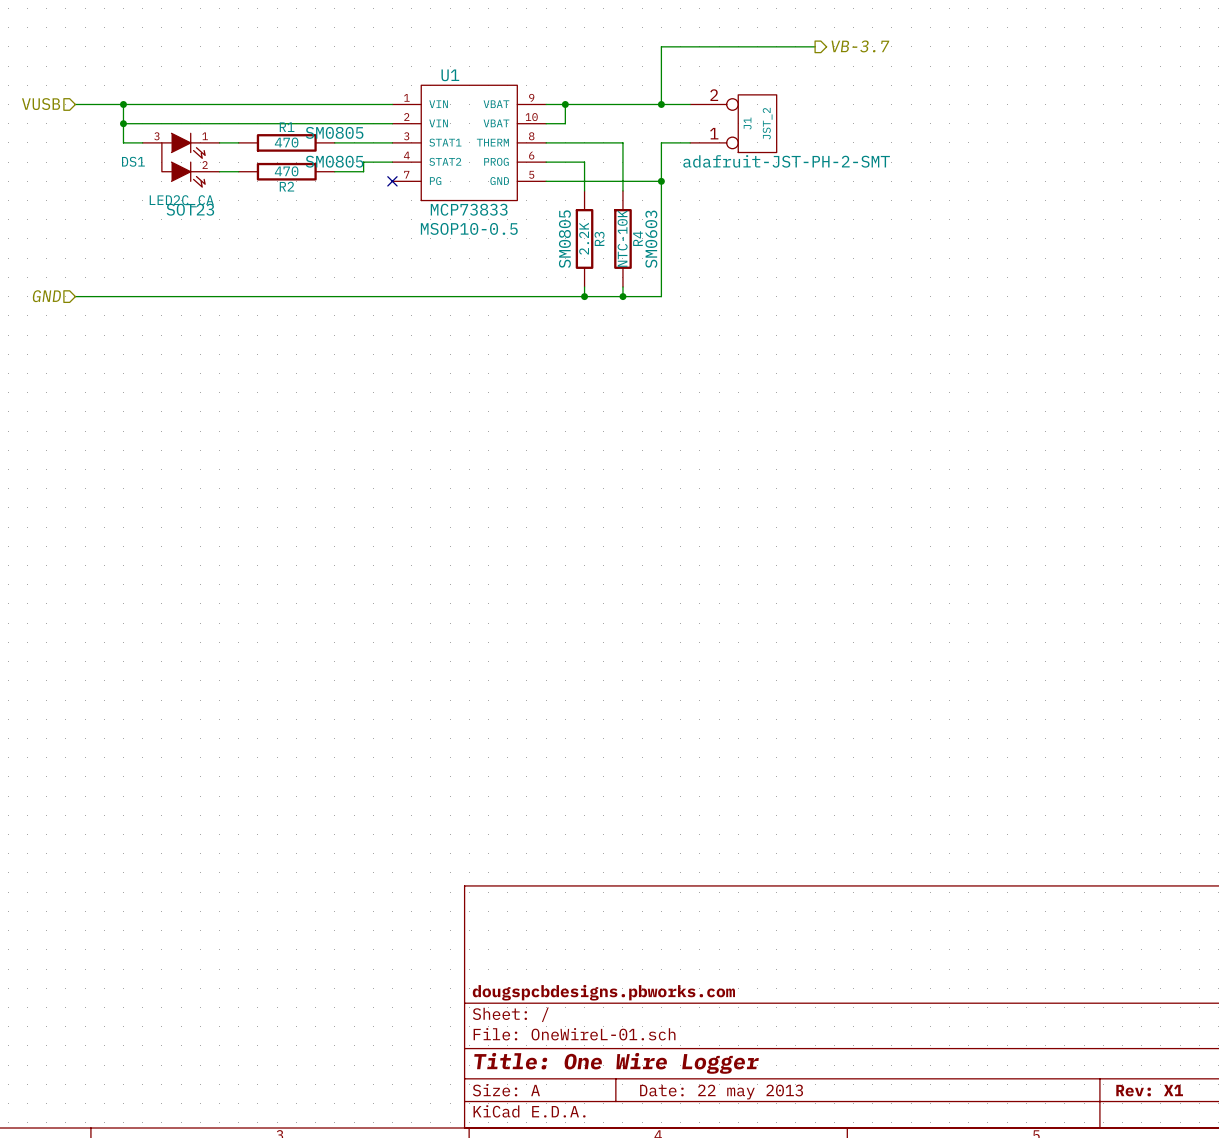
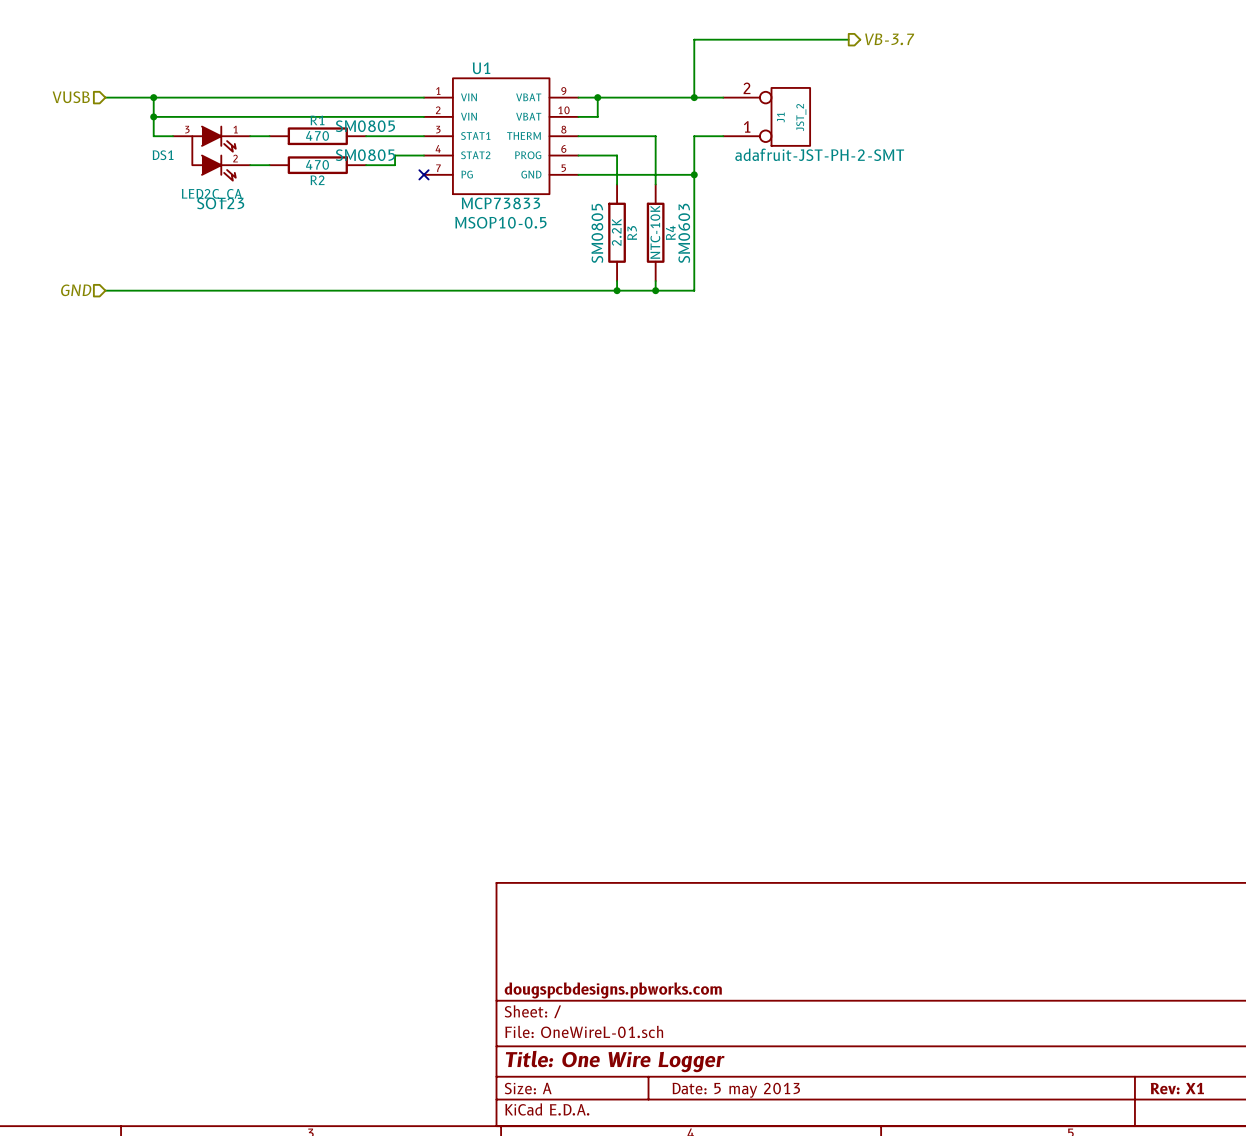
title block: Date: 22 may 2013 (721, 1092) -> Date: 5 may 2013 (736, 1090)

